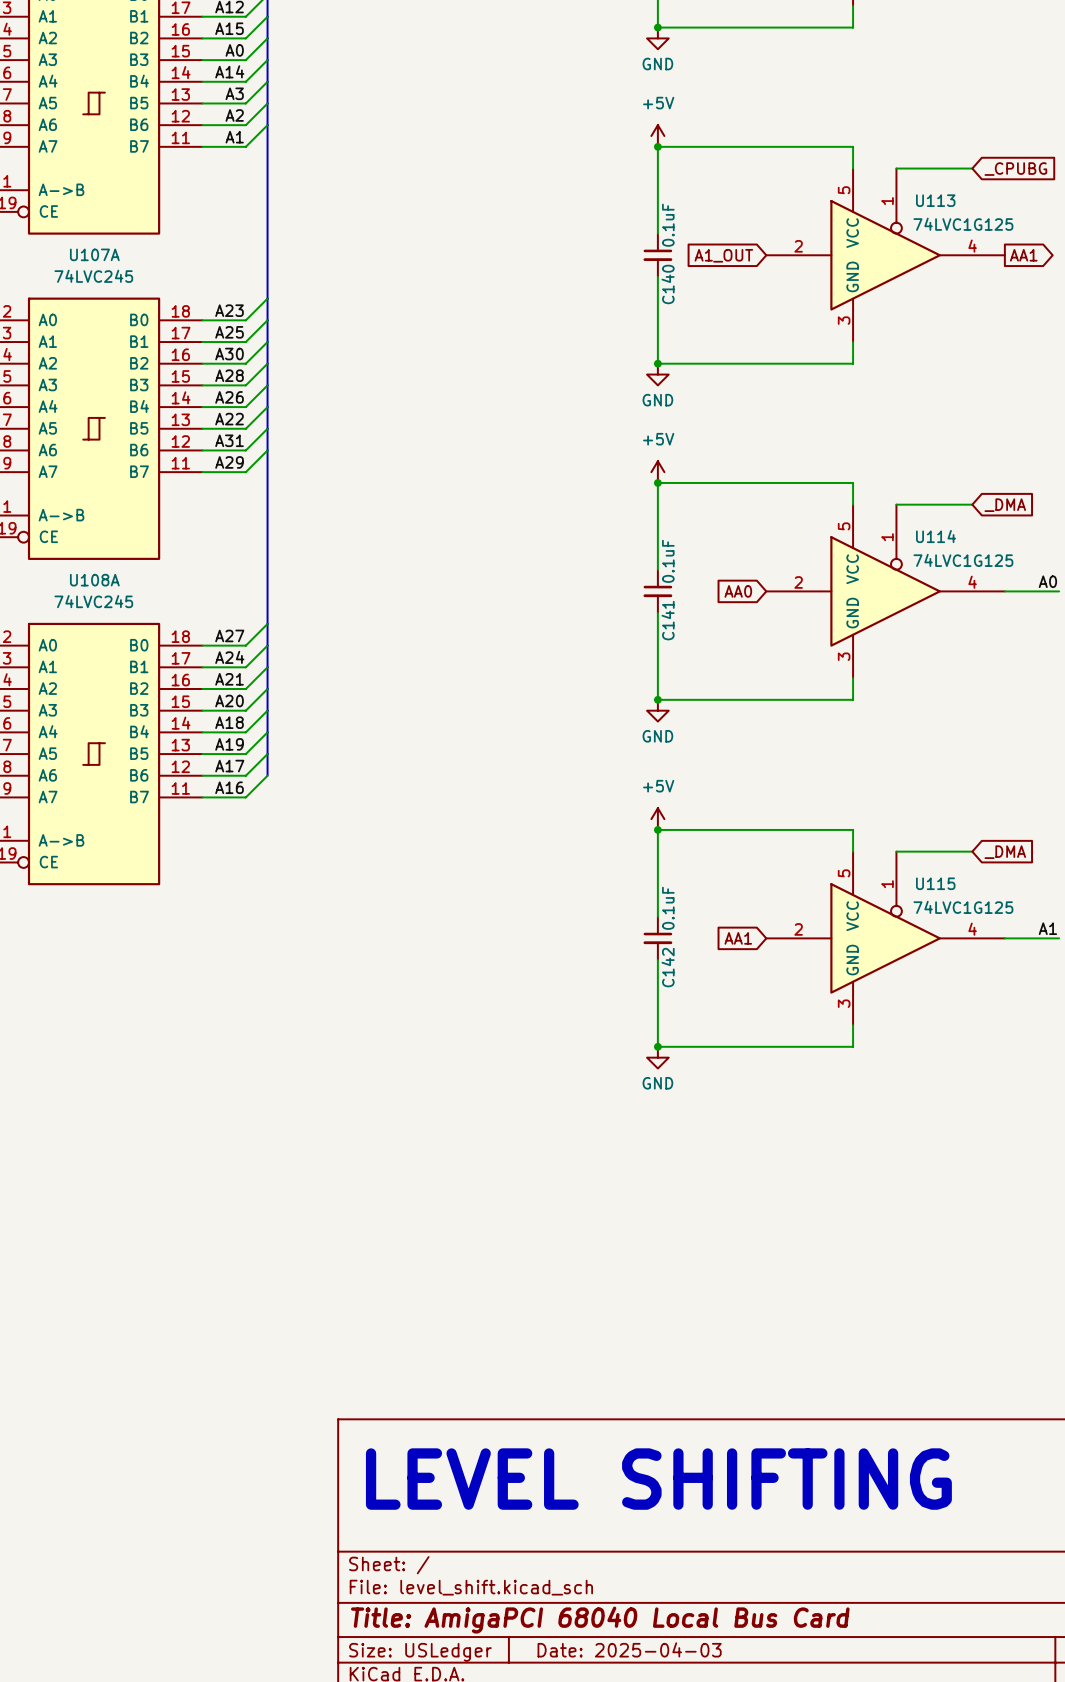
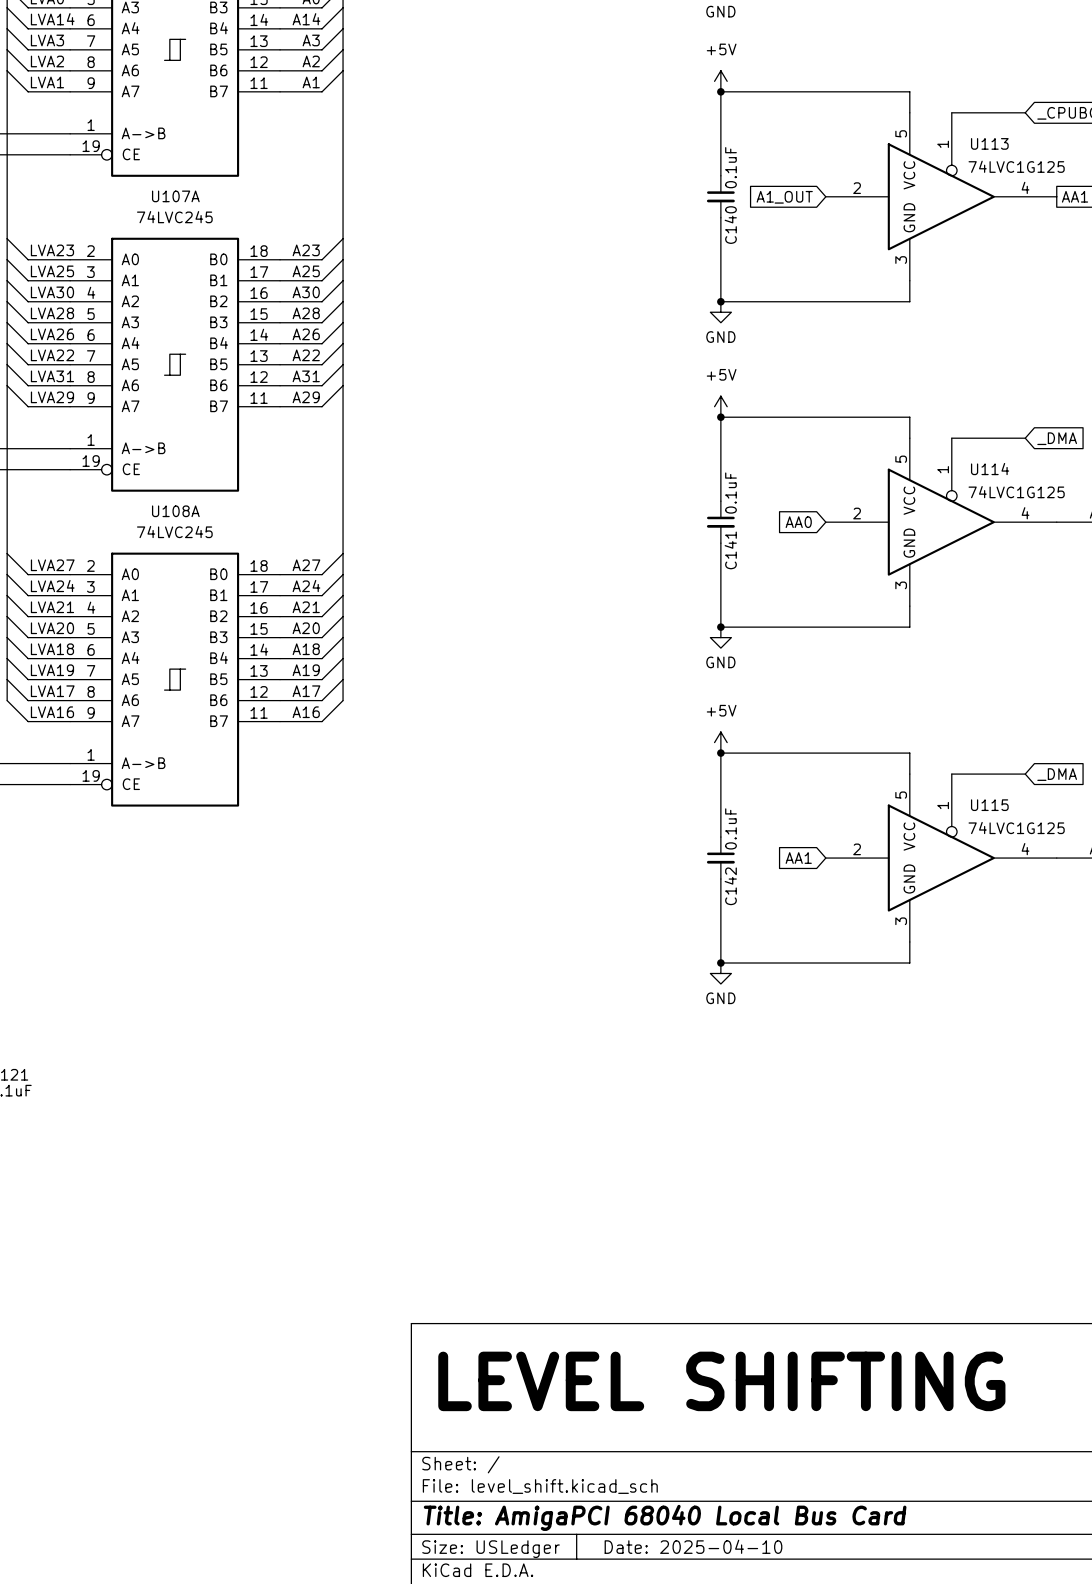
title block: Date: 2025-04-03 (629, 1649) -> Date: 2025-04-10 (693, 1546)

